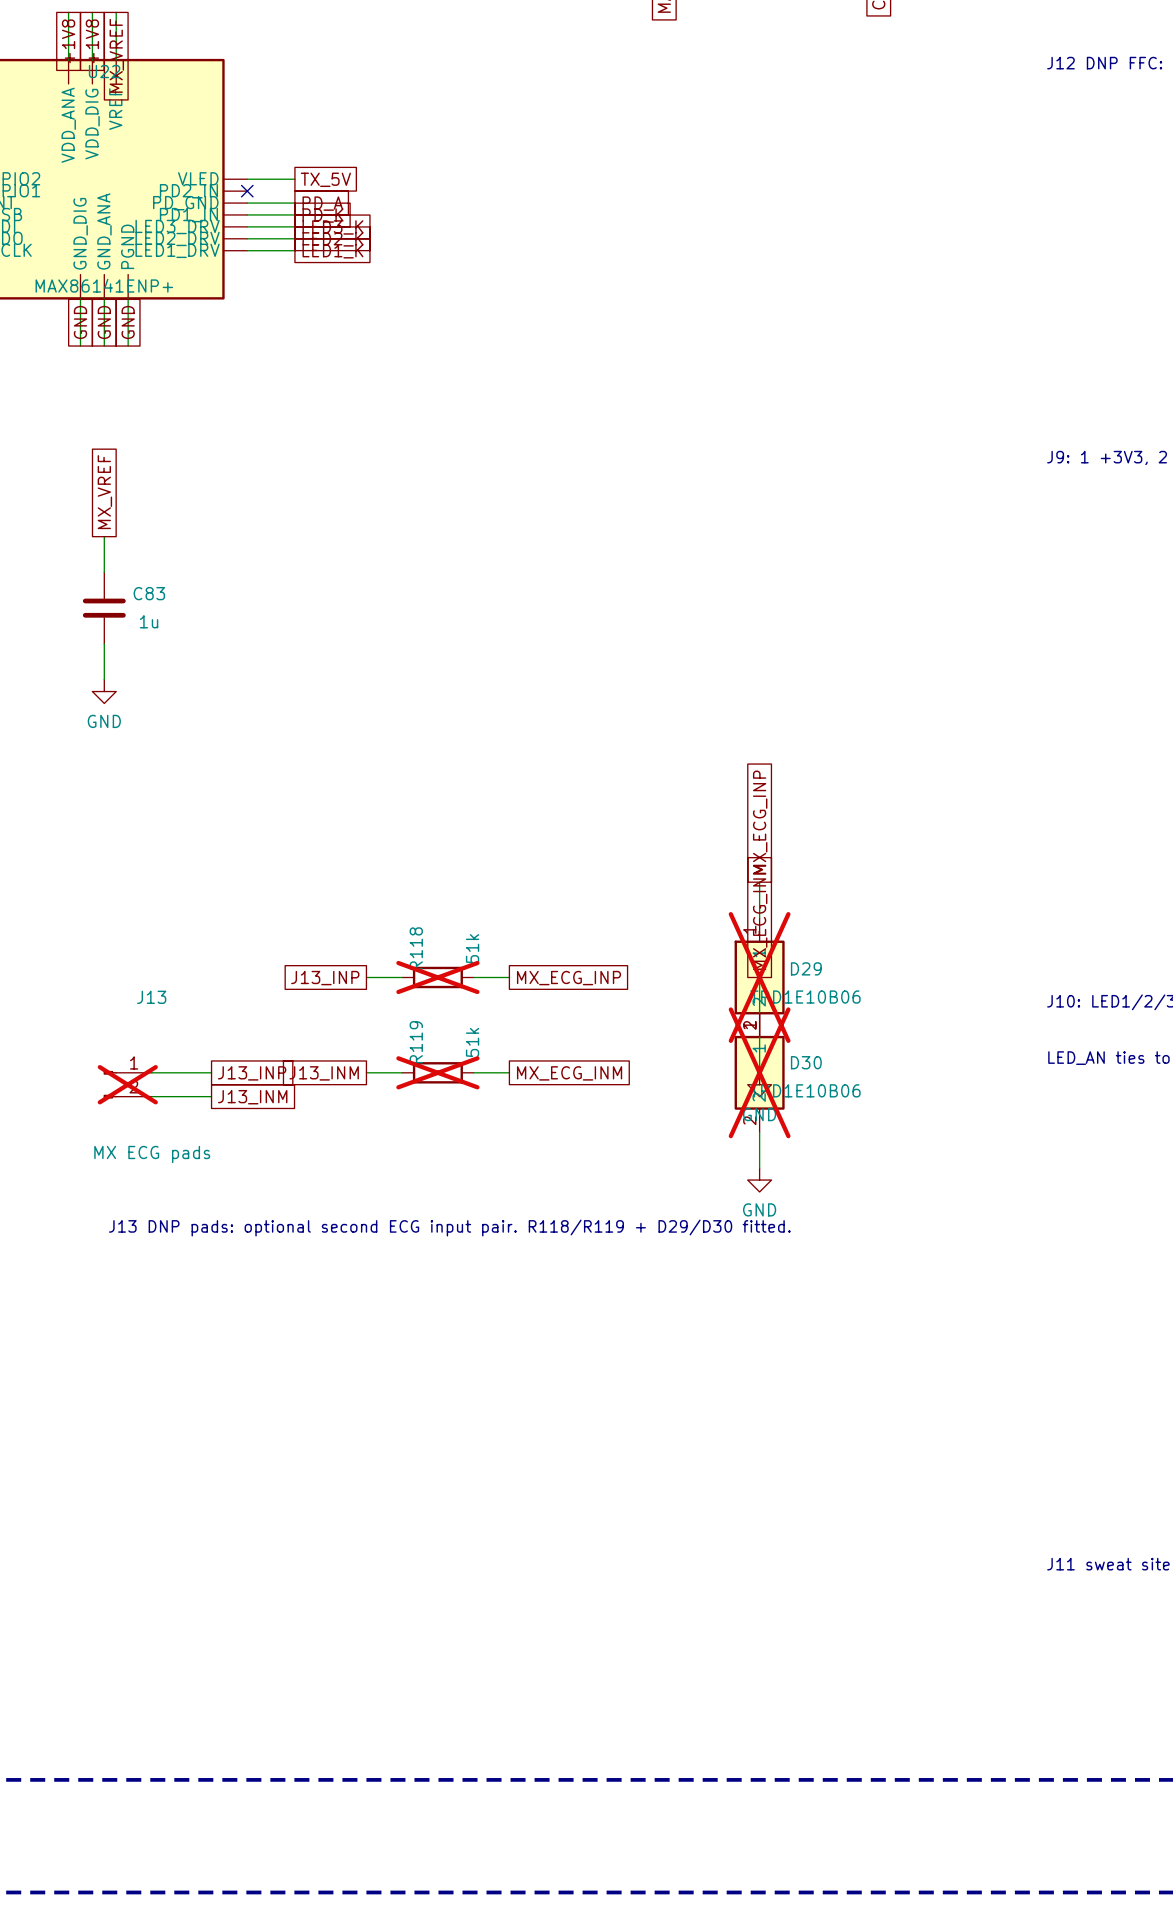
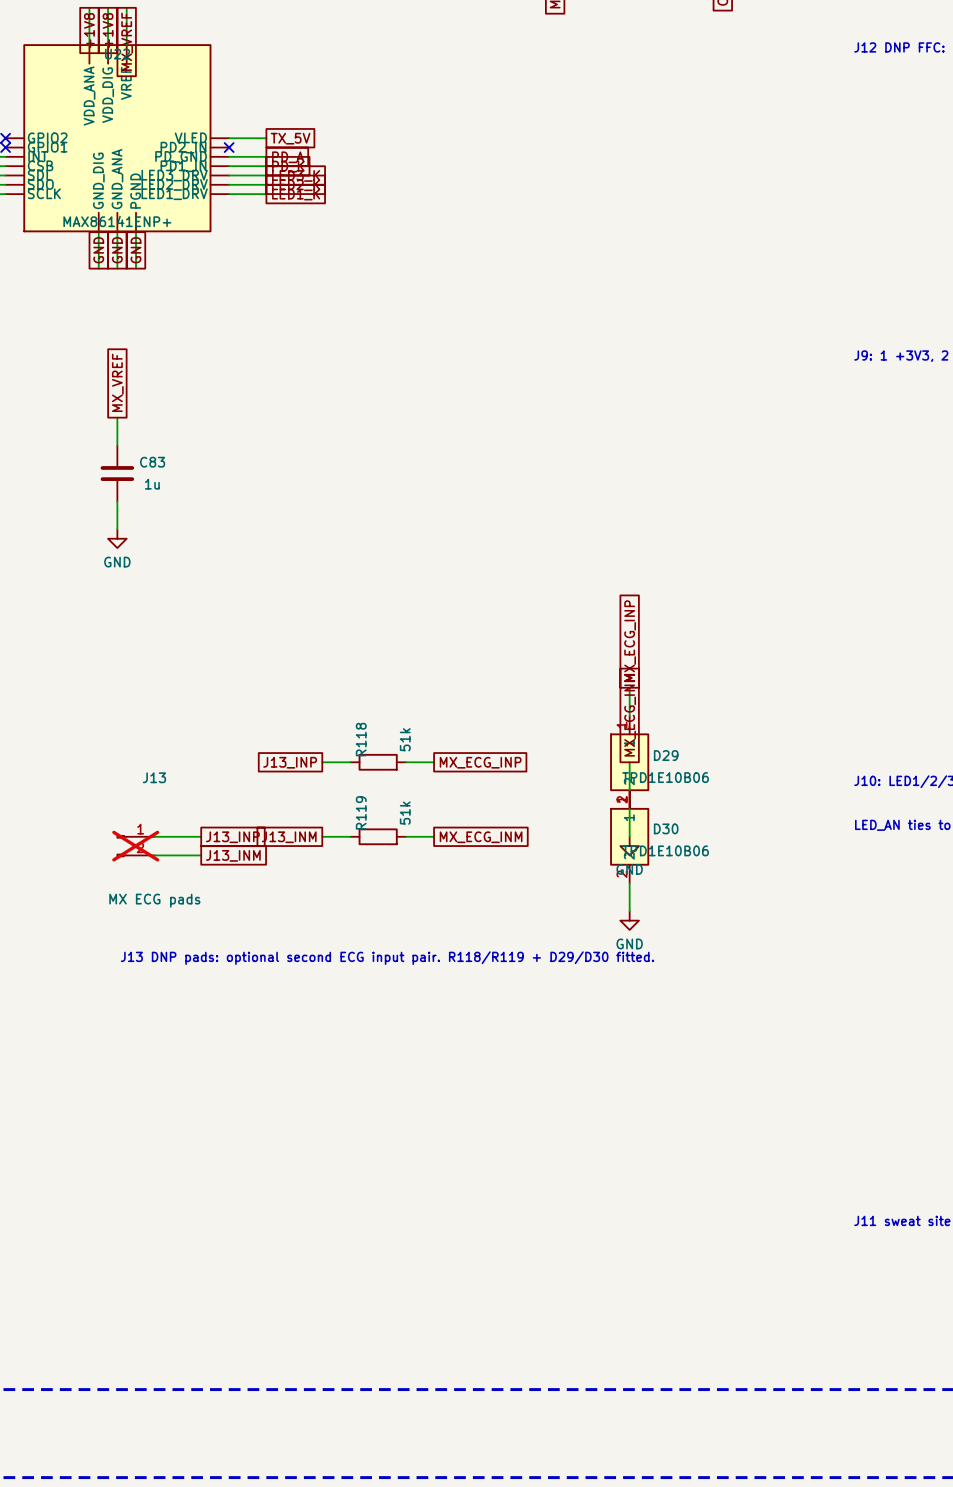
R118 do-not-place cross: (437, 977) -> none
D29 do-not-place cross: (759, 977) -> none
R119 do-not-place cross: (437, 1072) -> none
D30 do-not-place cross: (759, 1072) -> none

